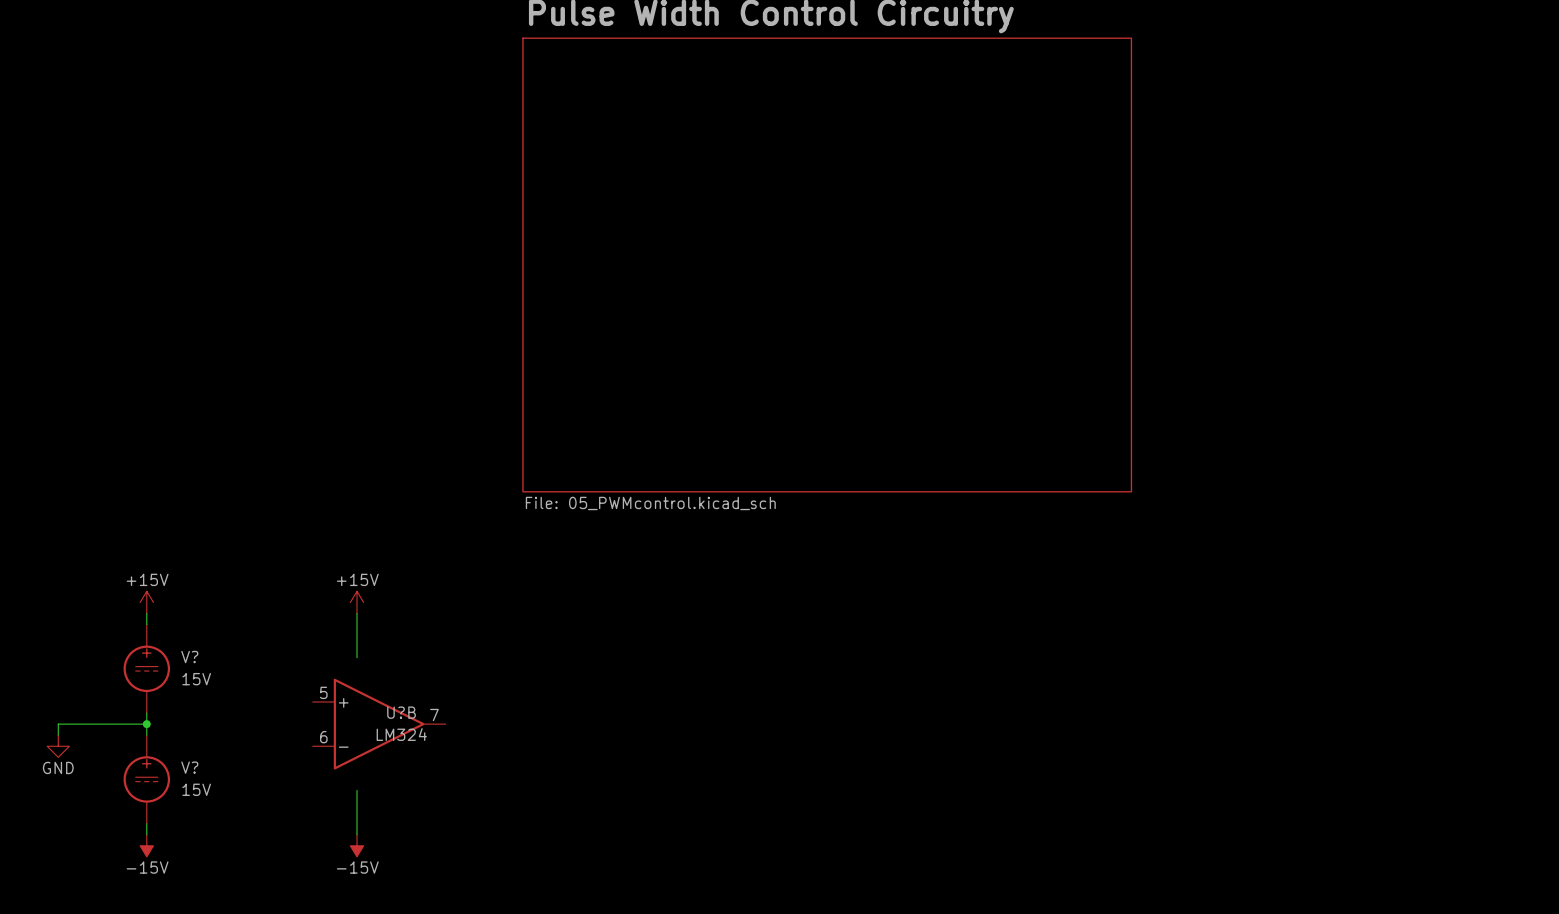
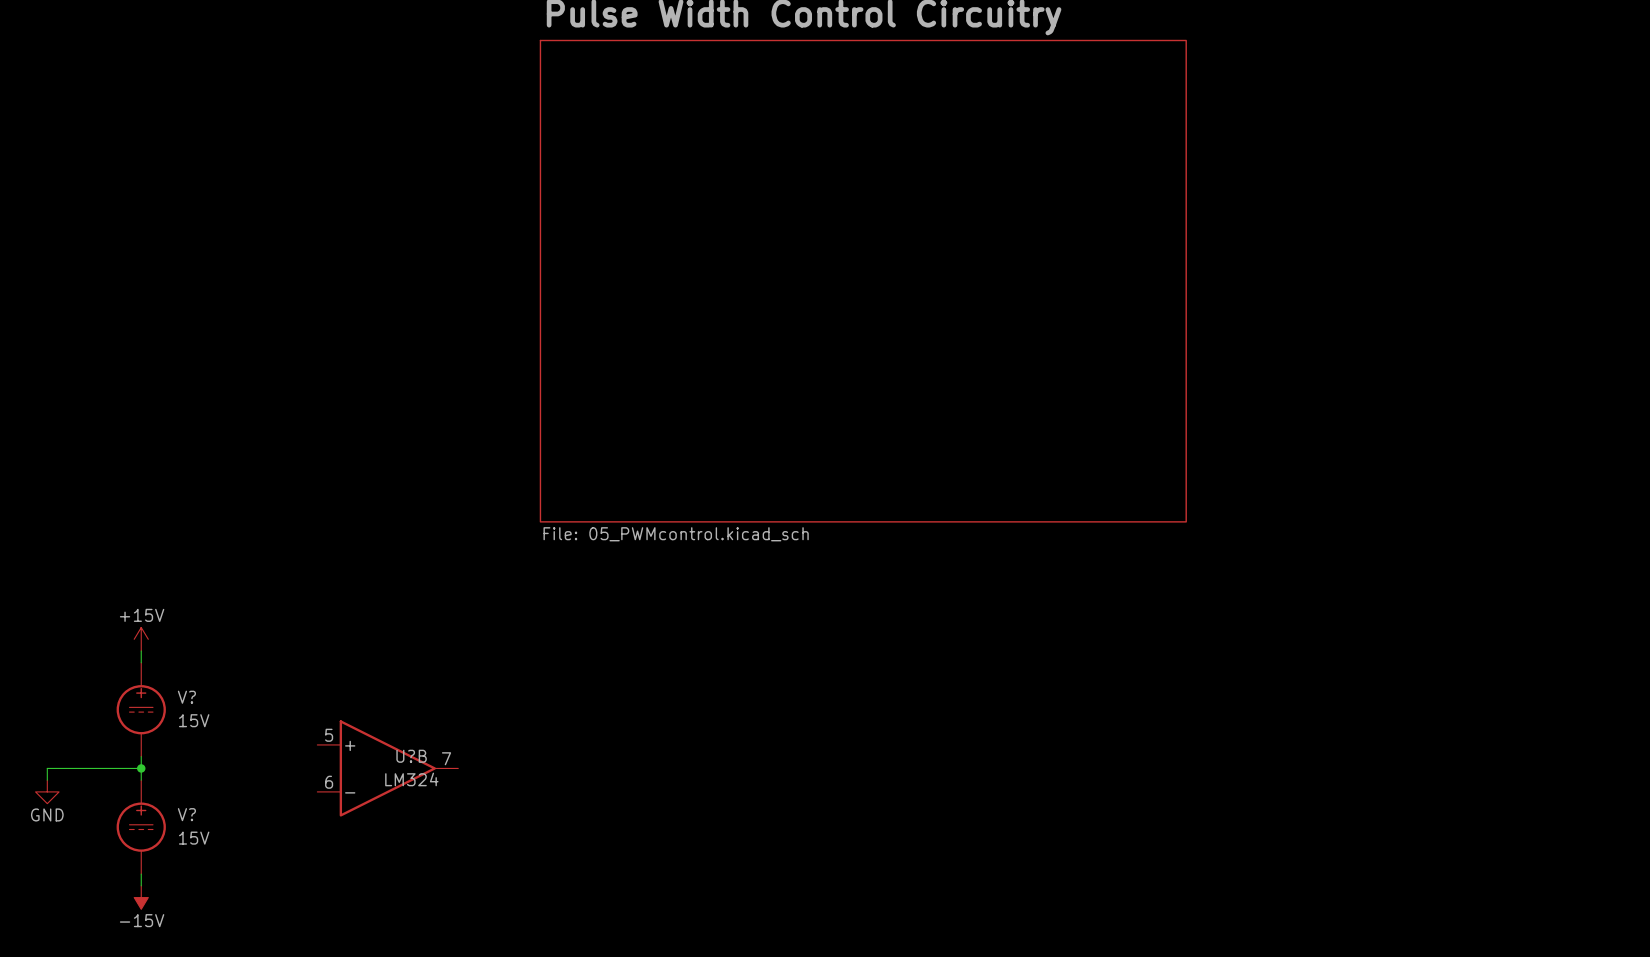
power symbol: +15V (357, 602) -> none
wire: (357, 613) (357, 657) -> none
wire: (357, 790) (357, 834) -> none
power symbol: -15V (357, 845) -> none

